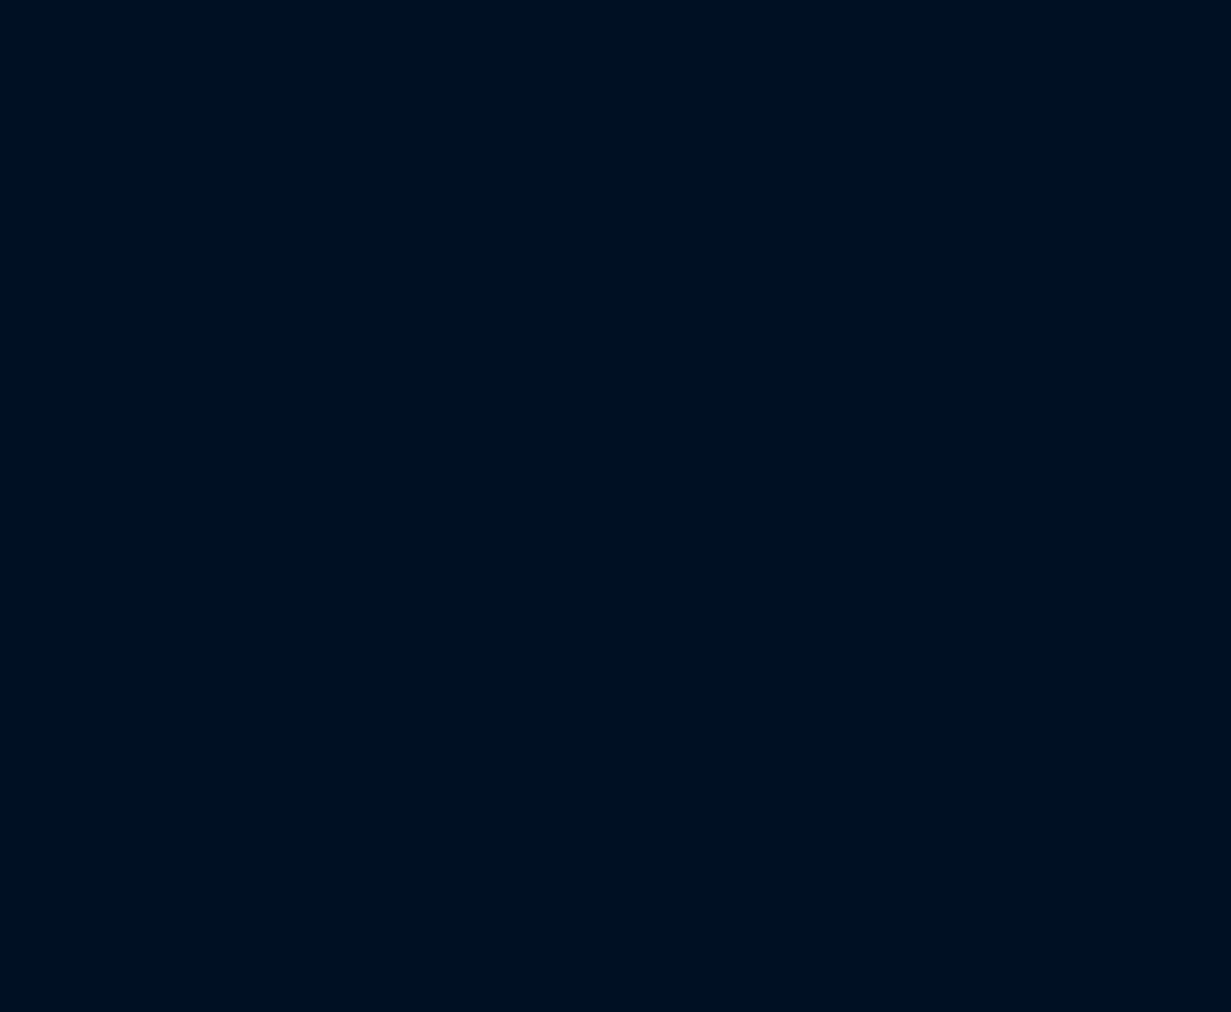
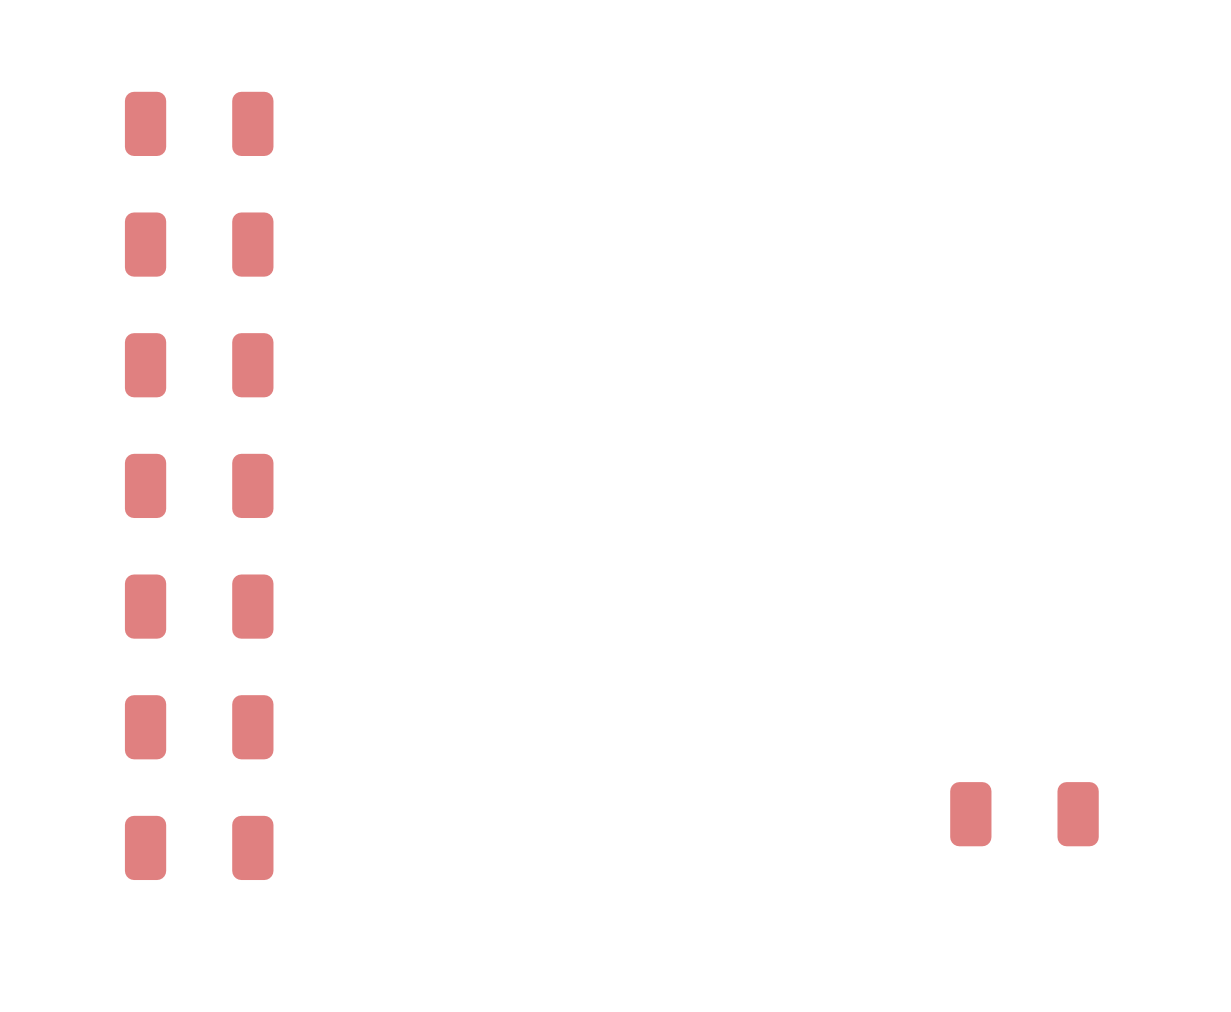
part: none -> (199, 123)
part: none -> (199, 244)
part: none -> (199, 365)
part: none -> (199, 485)
part: none -> (199, 606)
part: none -> (199, 727)
part: none -> (1024, 814)
part: none -> (199, 847)

